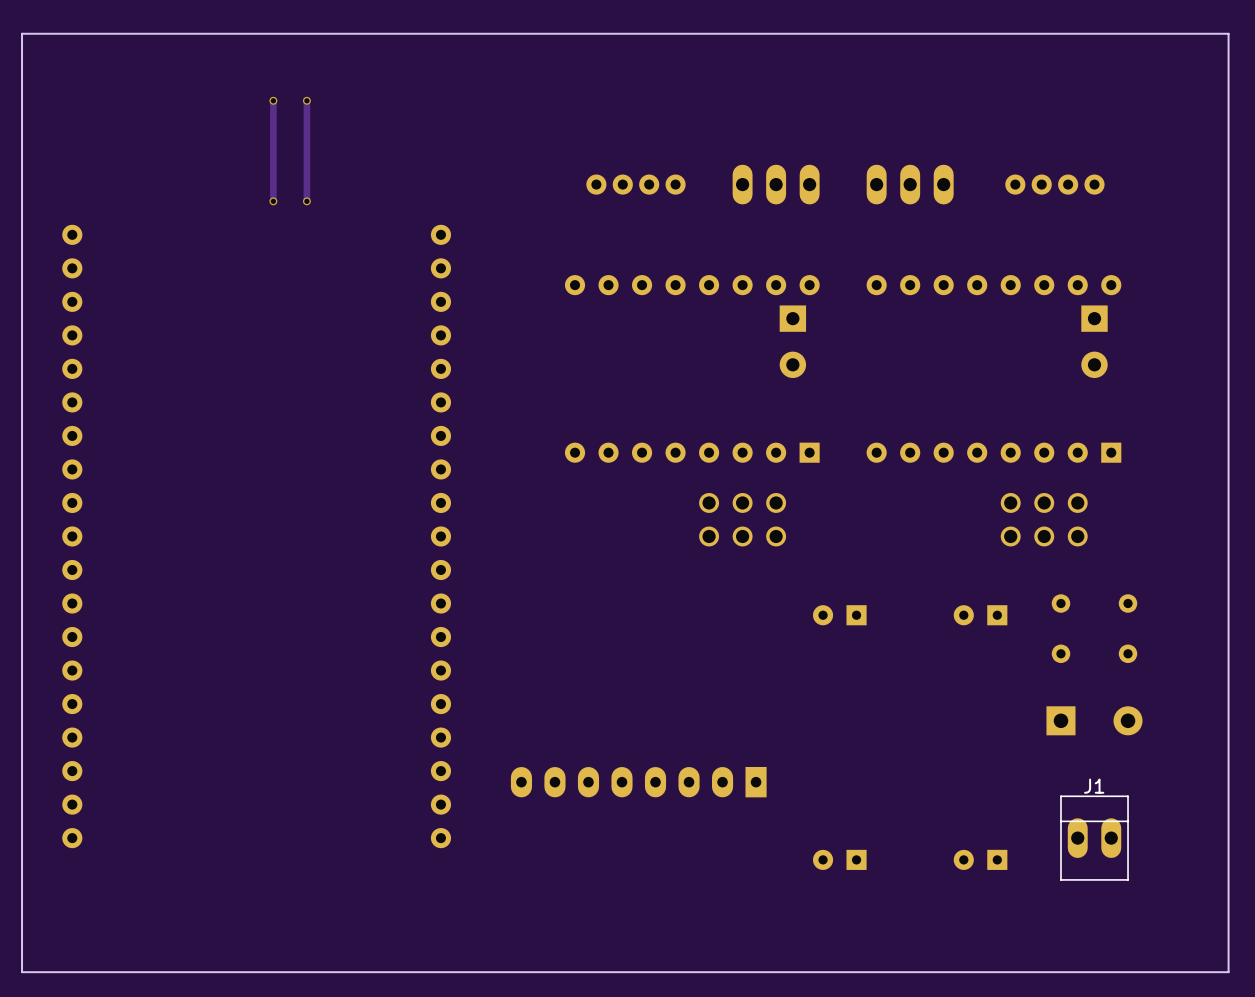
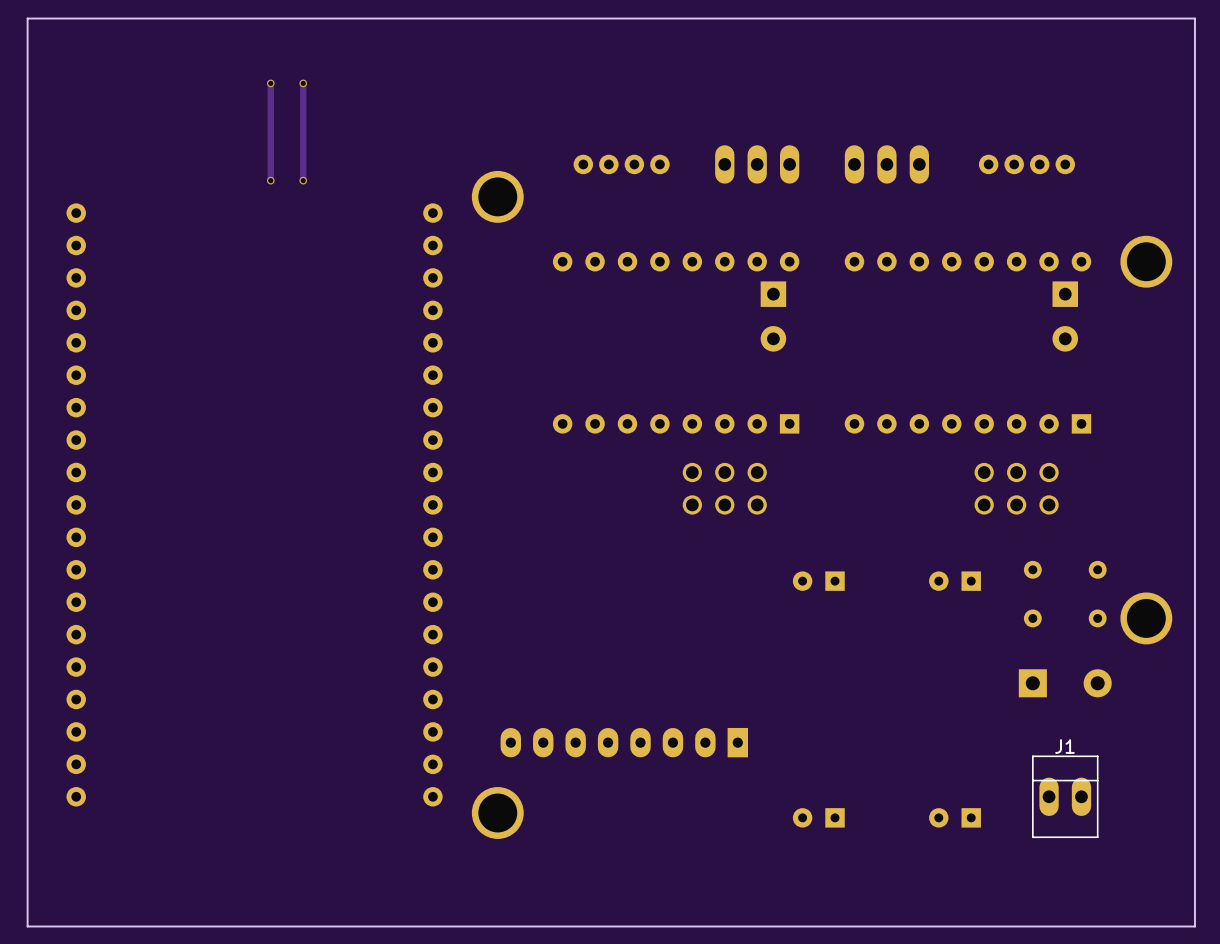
part: none -> (497, 196)
part: none -> (1146, 261)
part: none -> (1146, 618)
part: none -> (497, 812)

